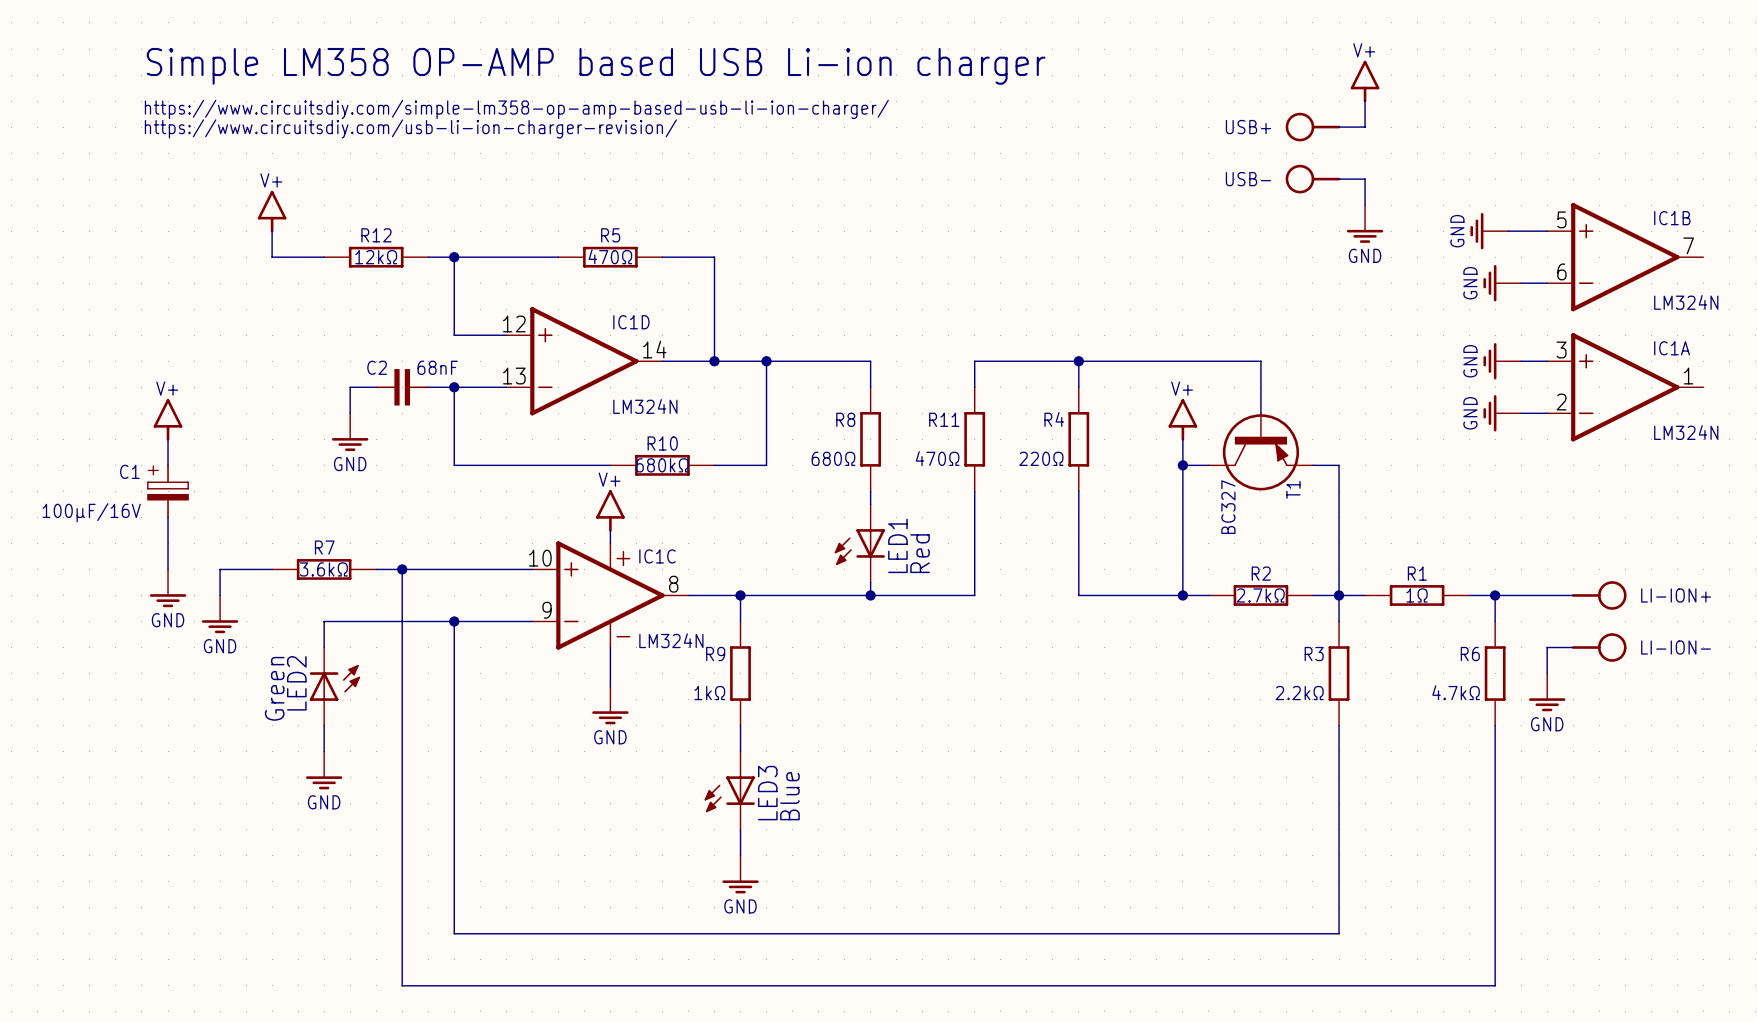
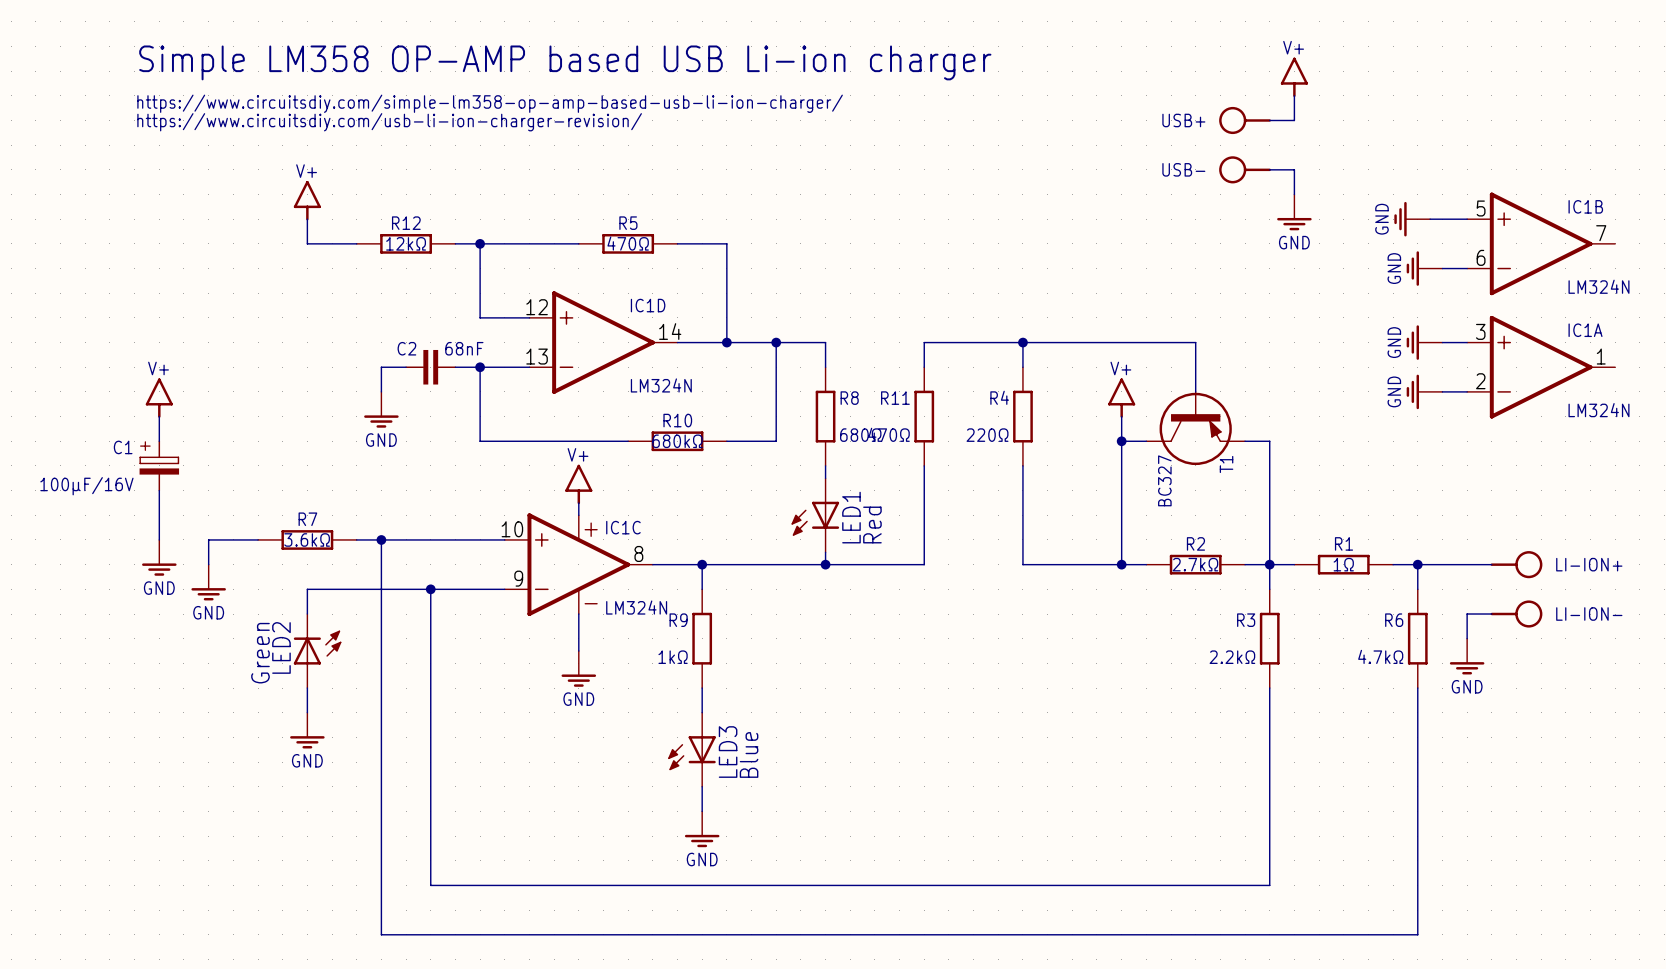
power symbol position: V+ (272, 211) -> V+ (307, 200)
wire: (272, 231) (272, 257) (324, 257) -> (307, 219) (307, 243) (356, 243)
R12 position: (376, 257) -> (406, 243)
wire: (454, 257) (454, 335) (506, 335) -> (480, 243) (480, 317) (529, 317)
junction position: (454, 257) -> (480, 243)
R5 position: (610, 257) -> (628, 243)
wire: (662, 257) (714, 257) (714, 361) (662, 361) -> none
IC1D position: (584, 361) -> (603, 342)
junction: (714, 361) -> none
wire: (766, 361) (766, 465) (714, 465) -> (726, 342) (726, 243) (677, 243)
wire: none -> (776, 342) (776, 441) (726, 441)
junction: none -> (776, 342)
wire: (376, 387) (350, 387) (350, 413) -> none
C2 position: (402, 387) -> (430, 367)
wire: (454, 387) (454, 465) (506, 465) -> (529, 367) (480, 367) (480, 441)
junction position: (454, 387) -> (480, 367)
R8 name position: R8 (845, 419) -> R8 (849, 398)
power symbol position: GND (350, 432) -> GND (381, 409)
R8 value position: 680Ω (833, 458) -> 680Ω (860, 435)
R10 position: (662, 465) -> (677, 441)

